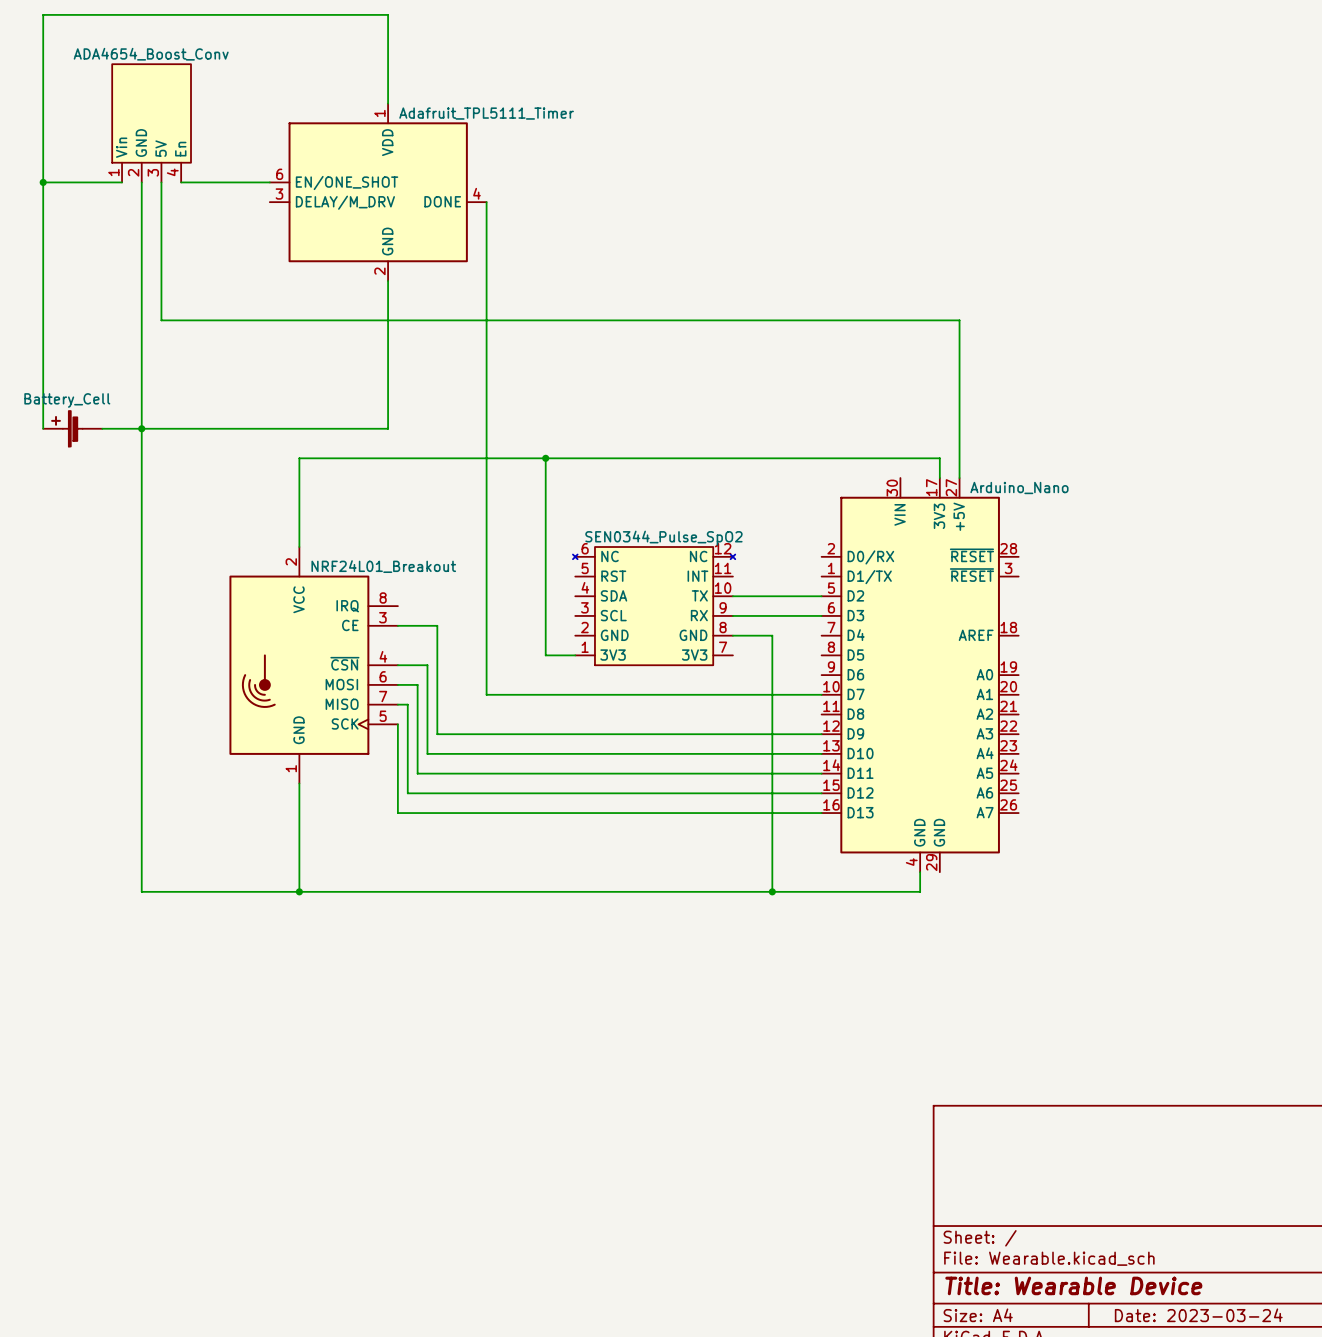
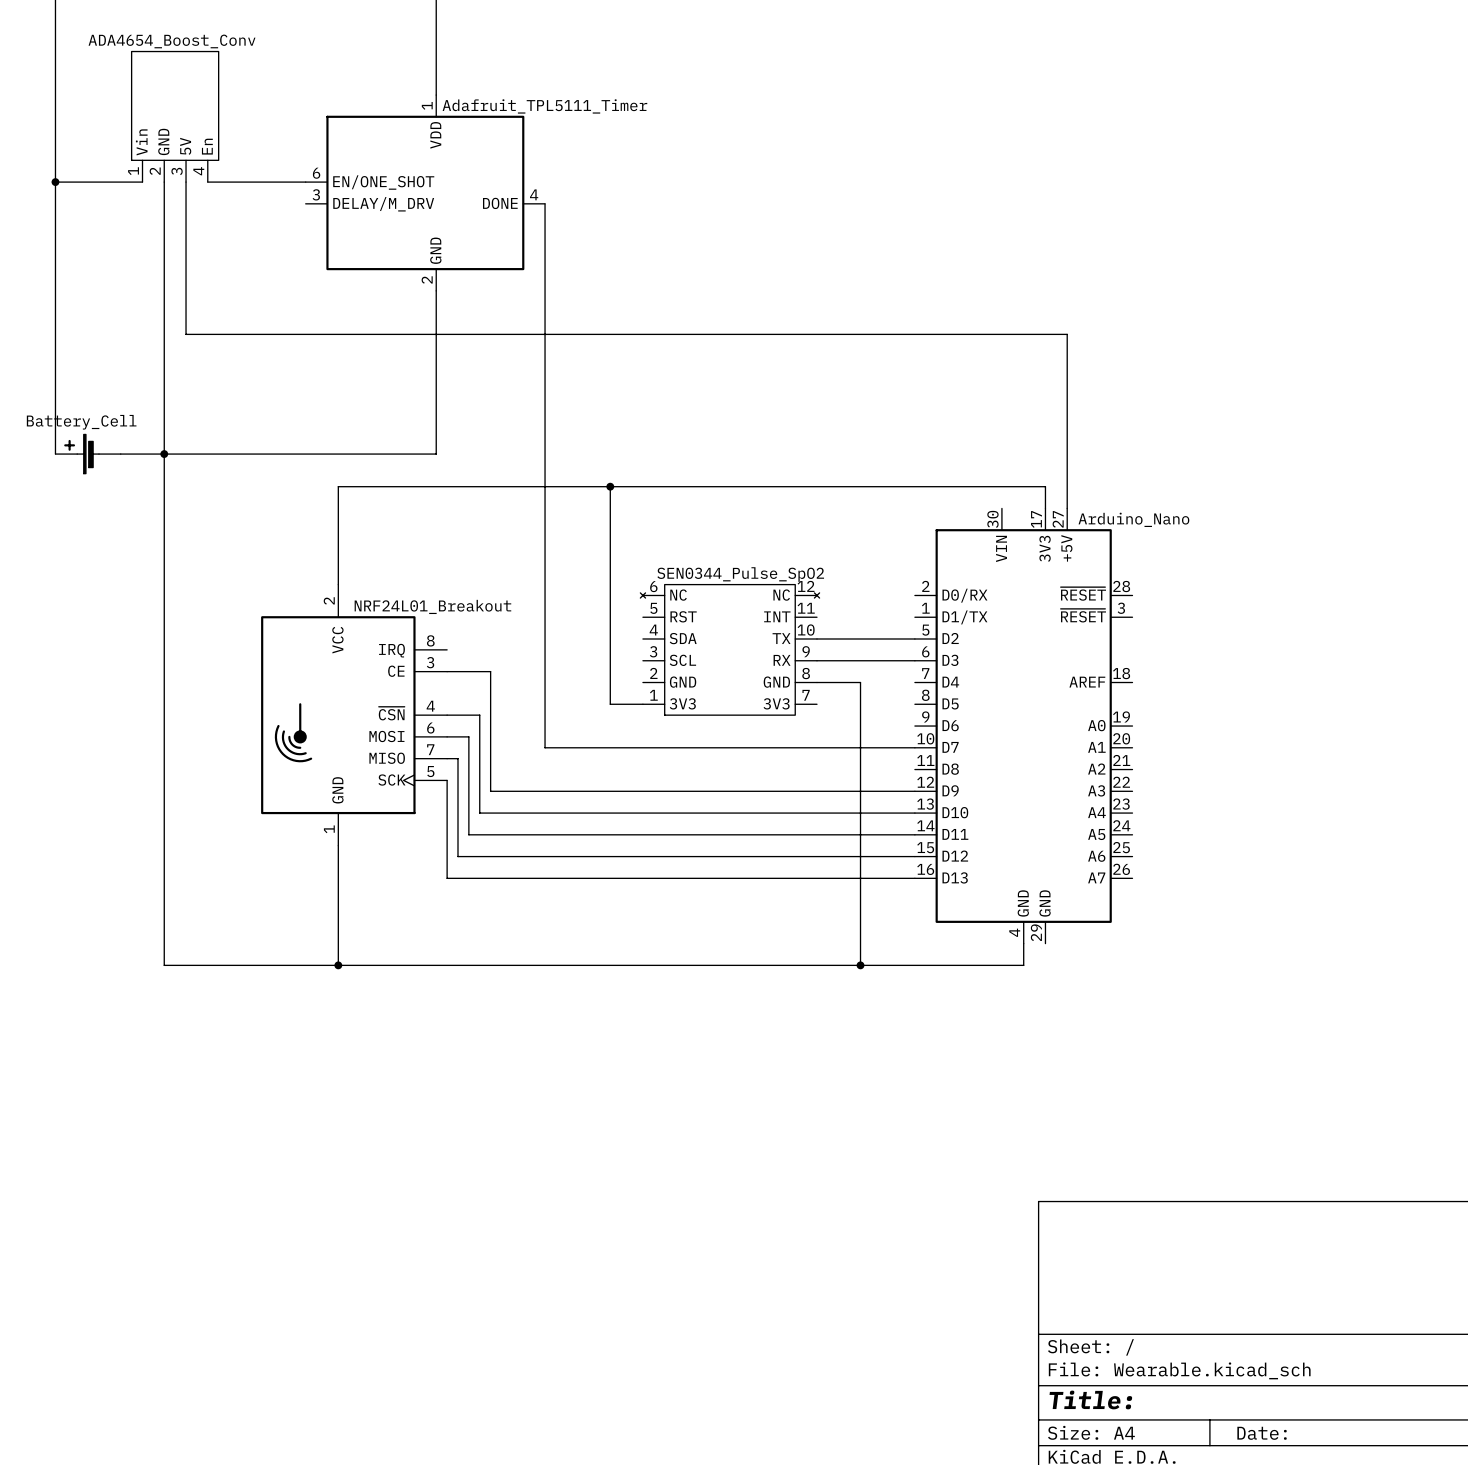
title block: Title: Wearable Device (1073, 1285) -> Title: (1090, 1399)
title block: Date: 2023-03-24 (1198, 1315) -> Date: (1262, 1433)

